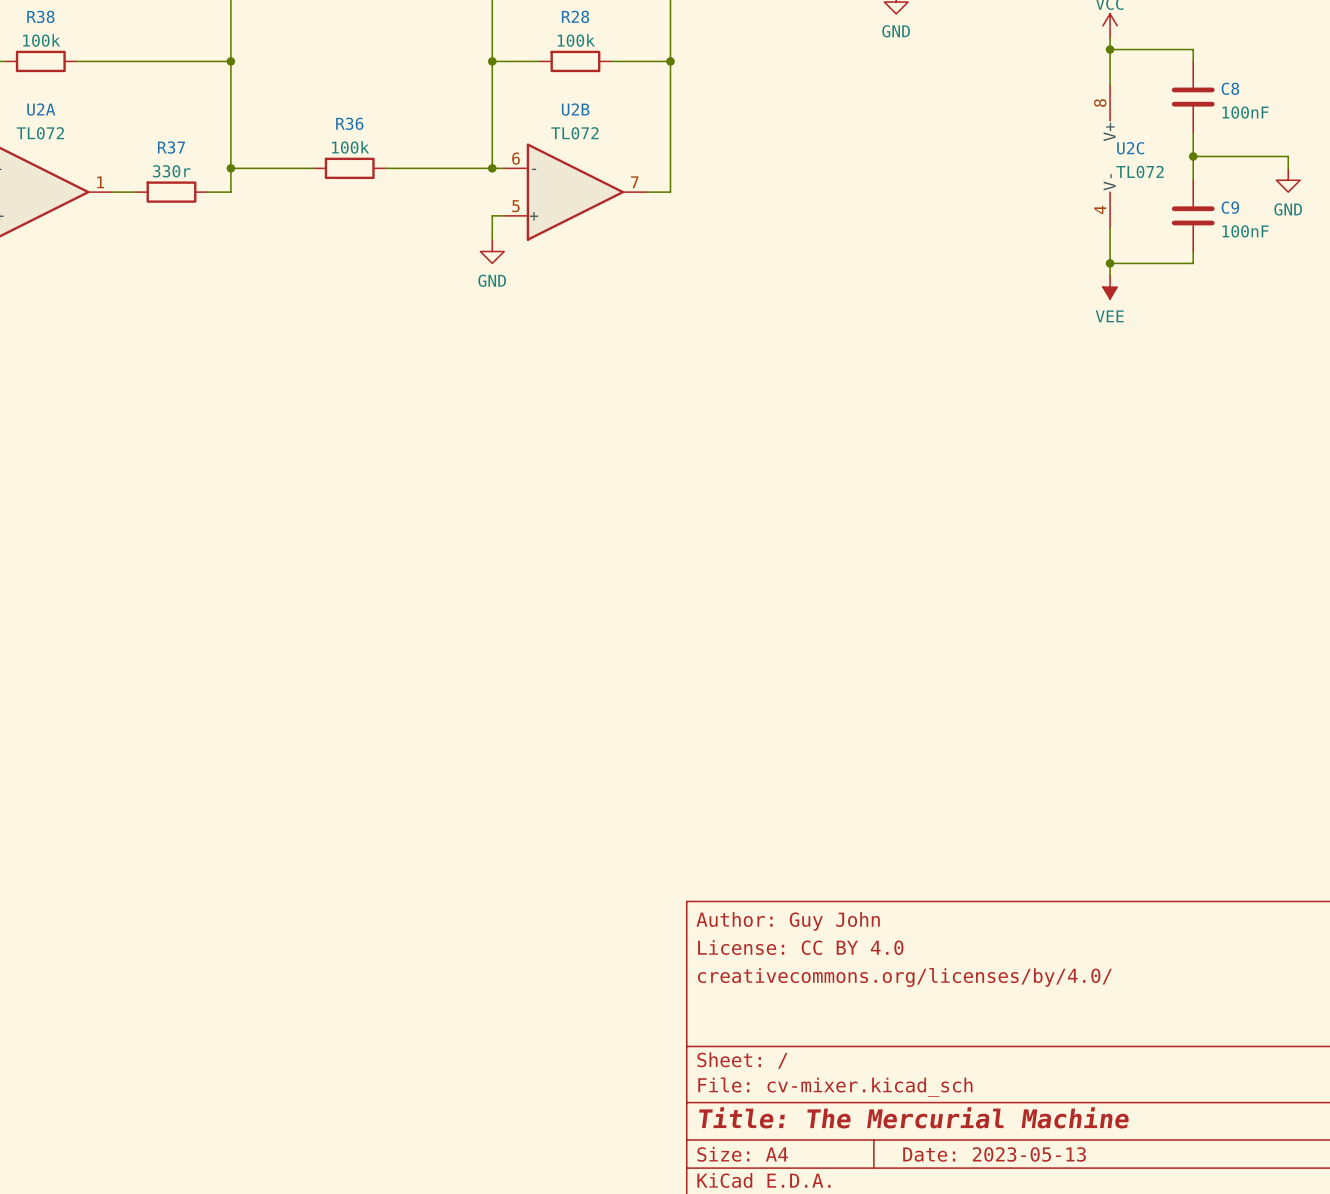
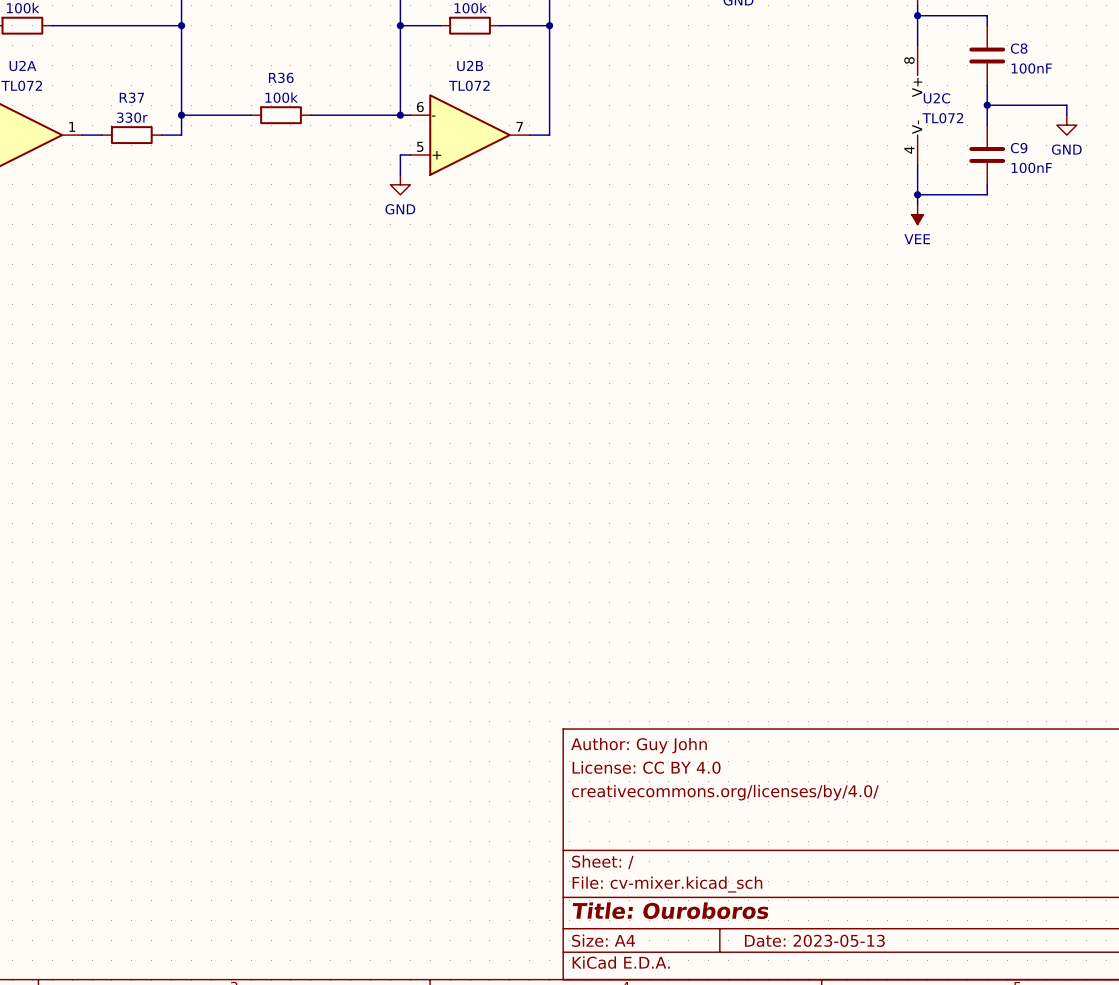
title block: Title: The Mercurial Machine (914, 1117) -> Title: Ouroboros (670, 910)

